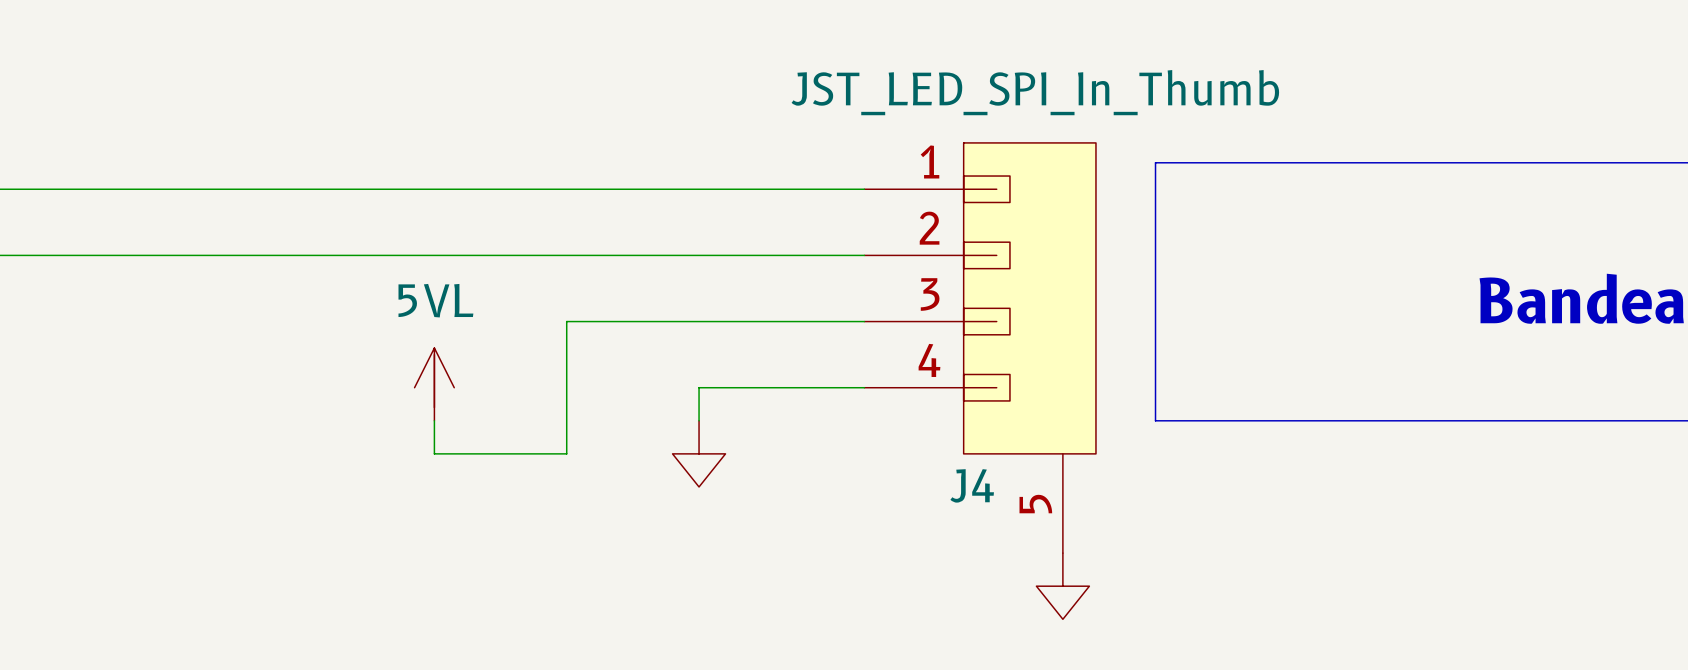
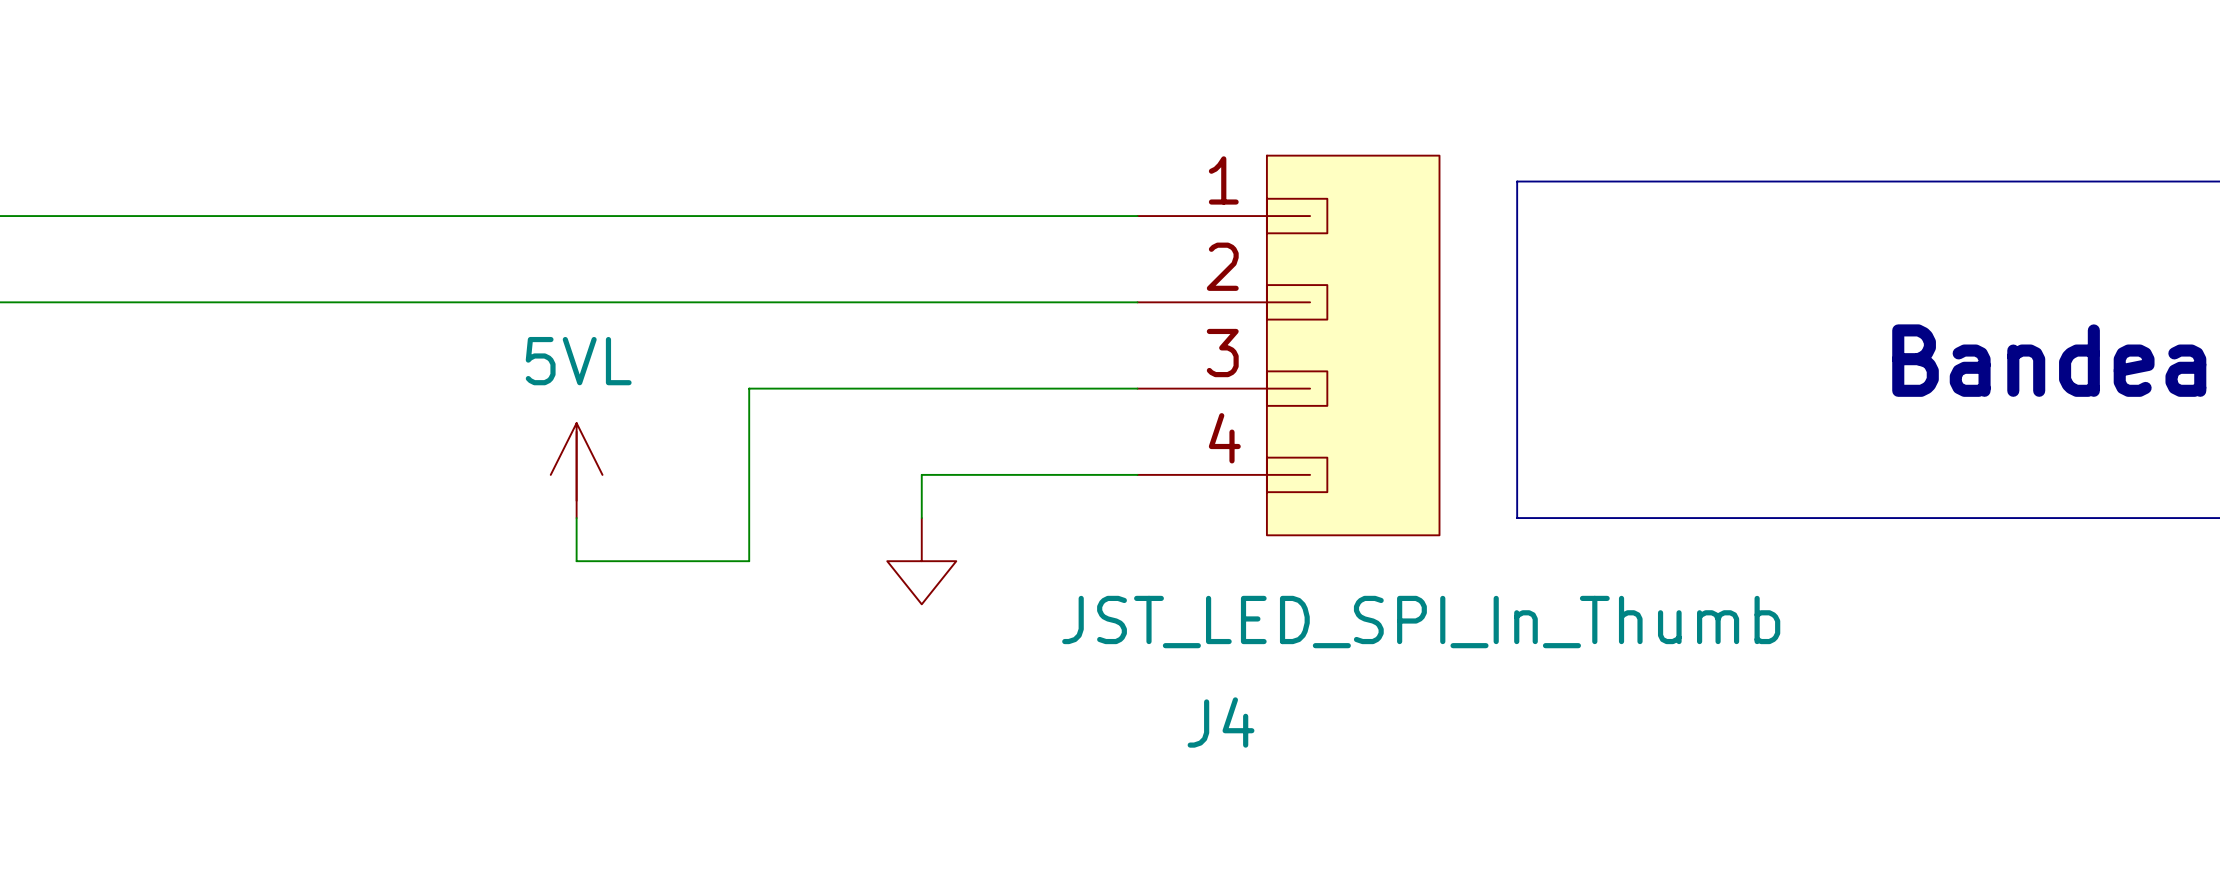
J4 value position: JST_LED_SPI_In_Thumb (1035, 92) -> JST_LED_SPI_In_Thumb (1421, 622)
J4 symbol: [864, 142, 1096, 554] -> [1137, 155, 1440, 536]
J4 name position: J4 (972, 485) -> J4 (1221, 722)
power symbol: (1062, 586) -> none

